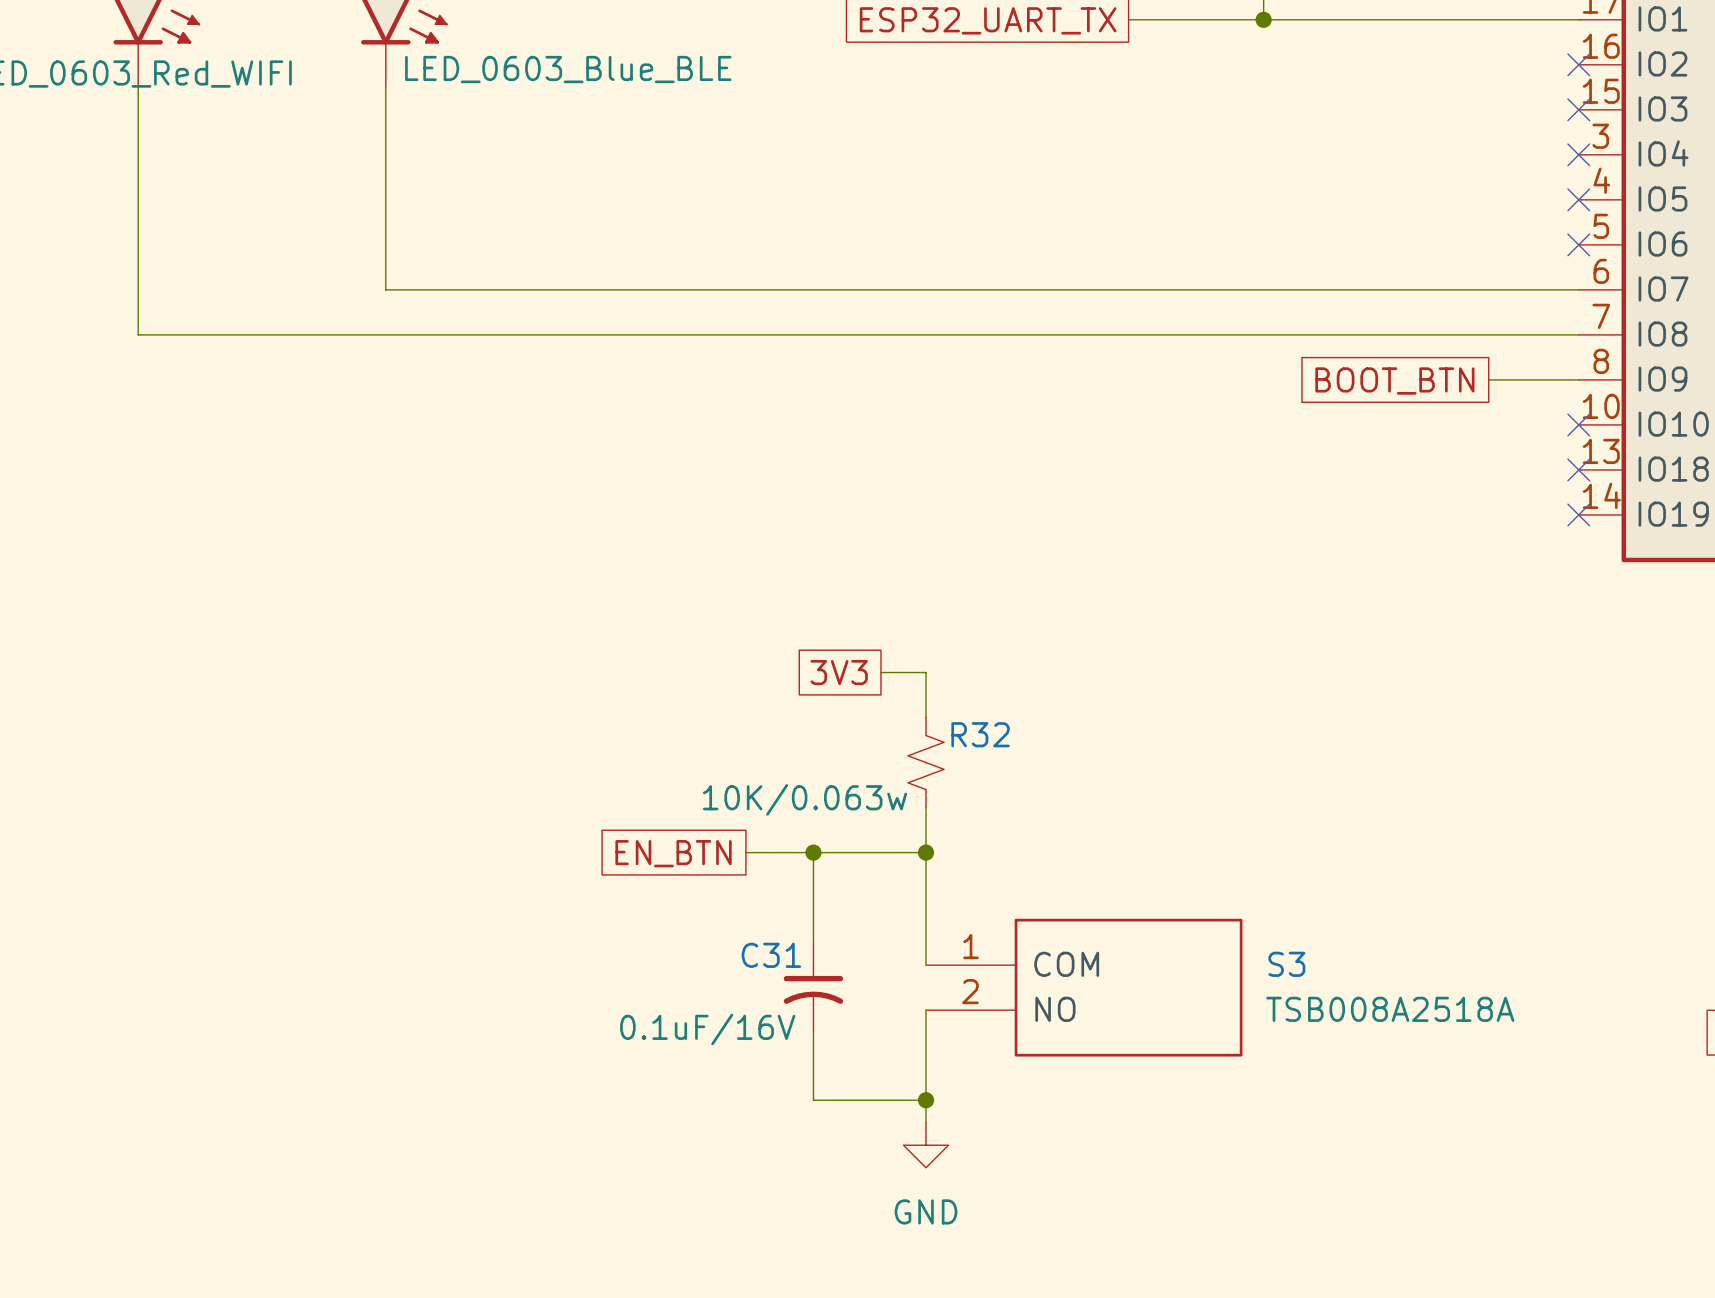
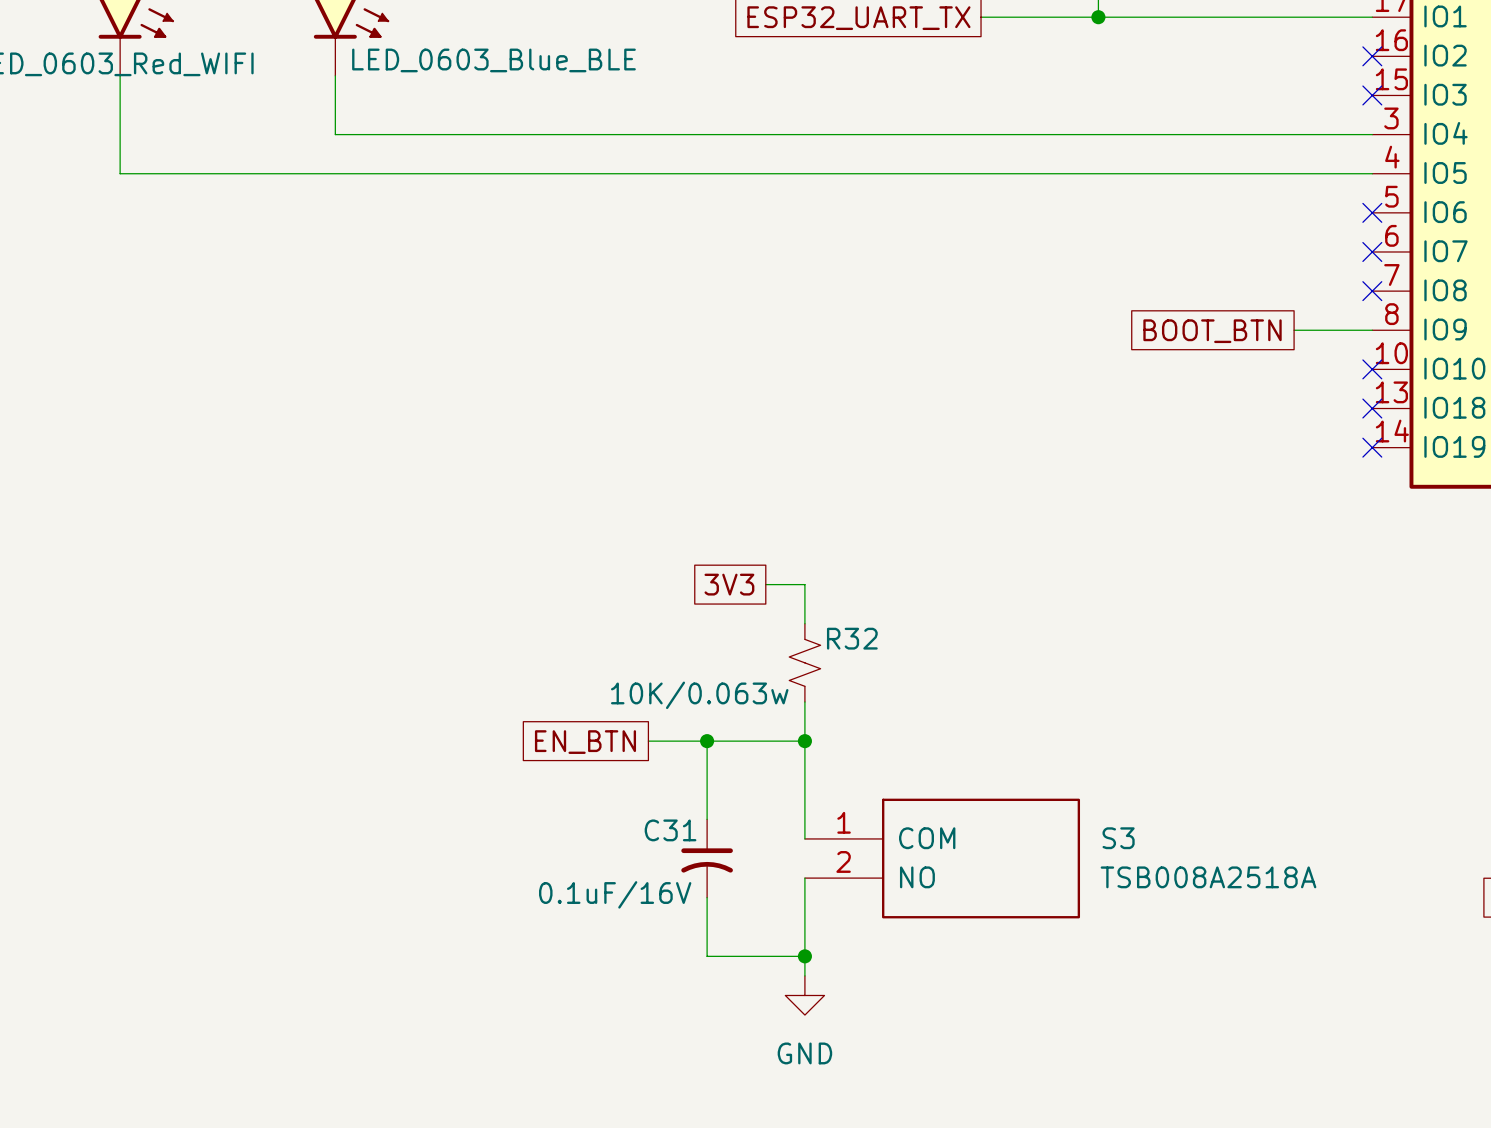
wire: (385, 154) (385, 289) (1578, 289) -> (335, 134) (1372, 134)
no-connect mark: (1578, 154) -> none
wire: (138, 199) (138, 334) (1578, 334) -> (120, 173) (1372, 173)
no-connect mark: (1578, 199) -> none
no-connect mark: none -> (1372, 251)
no-connect mark: none -> (1372, 291)

